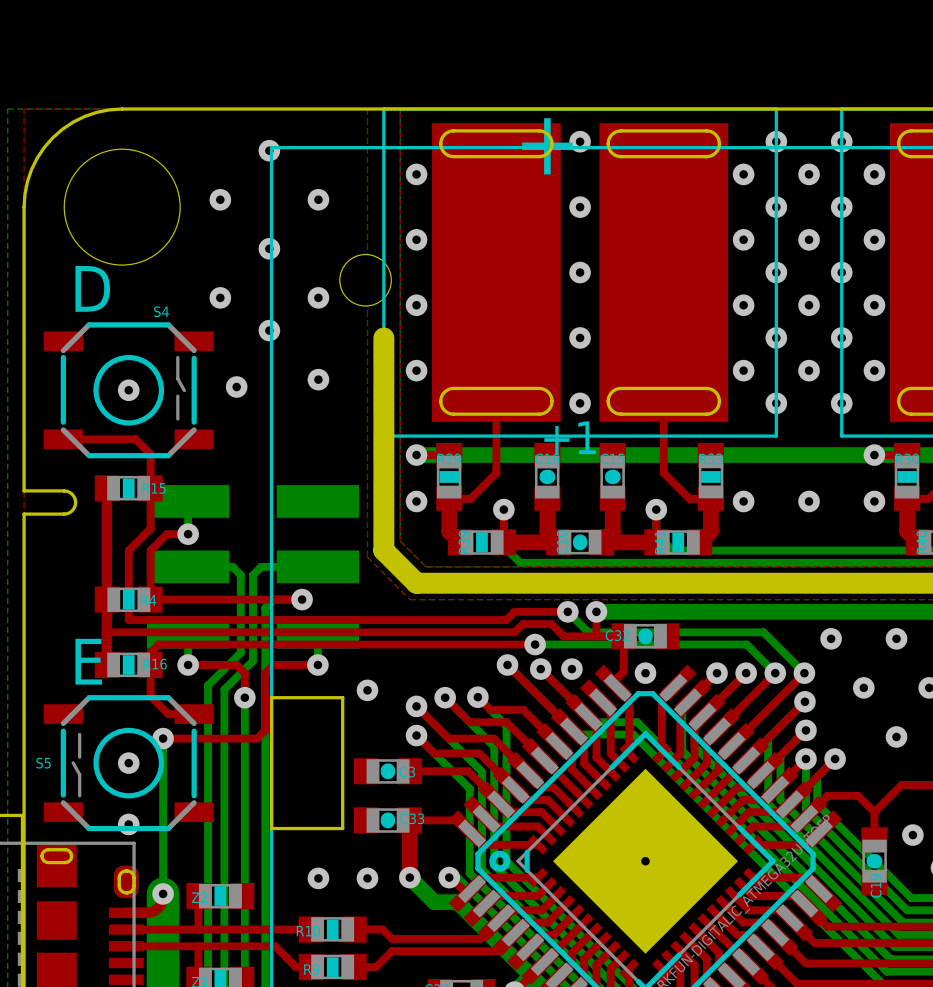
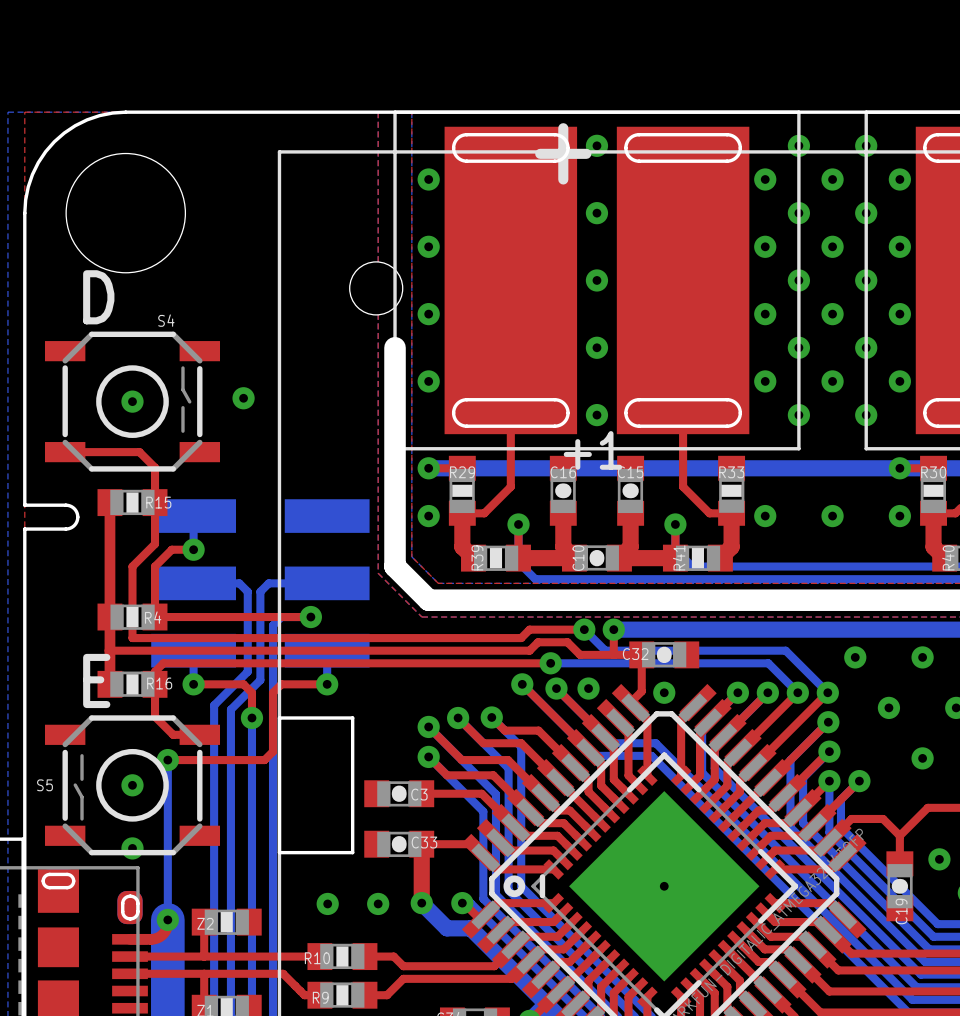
via: (269, 150) -> none
via: (220, 199) -> none
via: (318, 199) -> none
via: (269, 248) -> none
via: (220, 297) -> none
via: (318, 297) -> none
via: (269, 330) -> none
via: (318, 379) -> none
via: (367, 690) -> none

